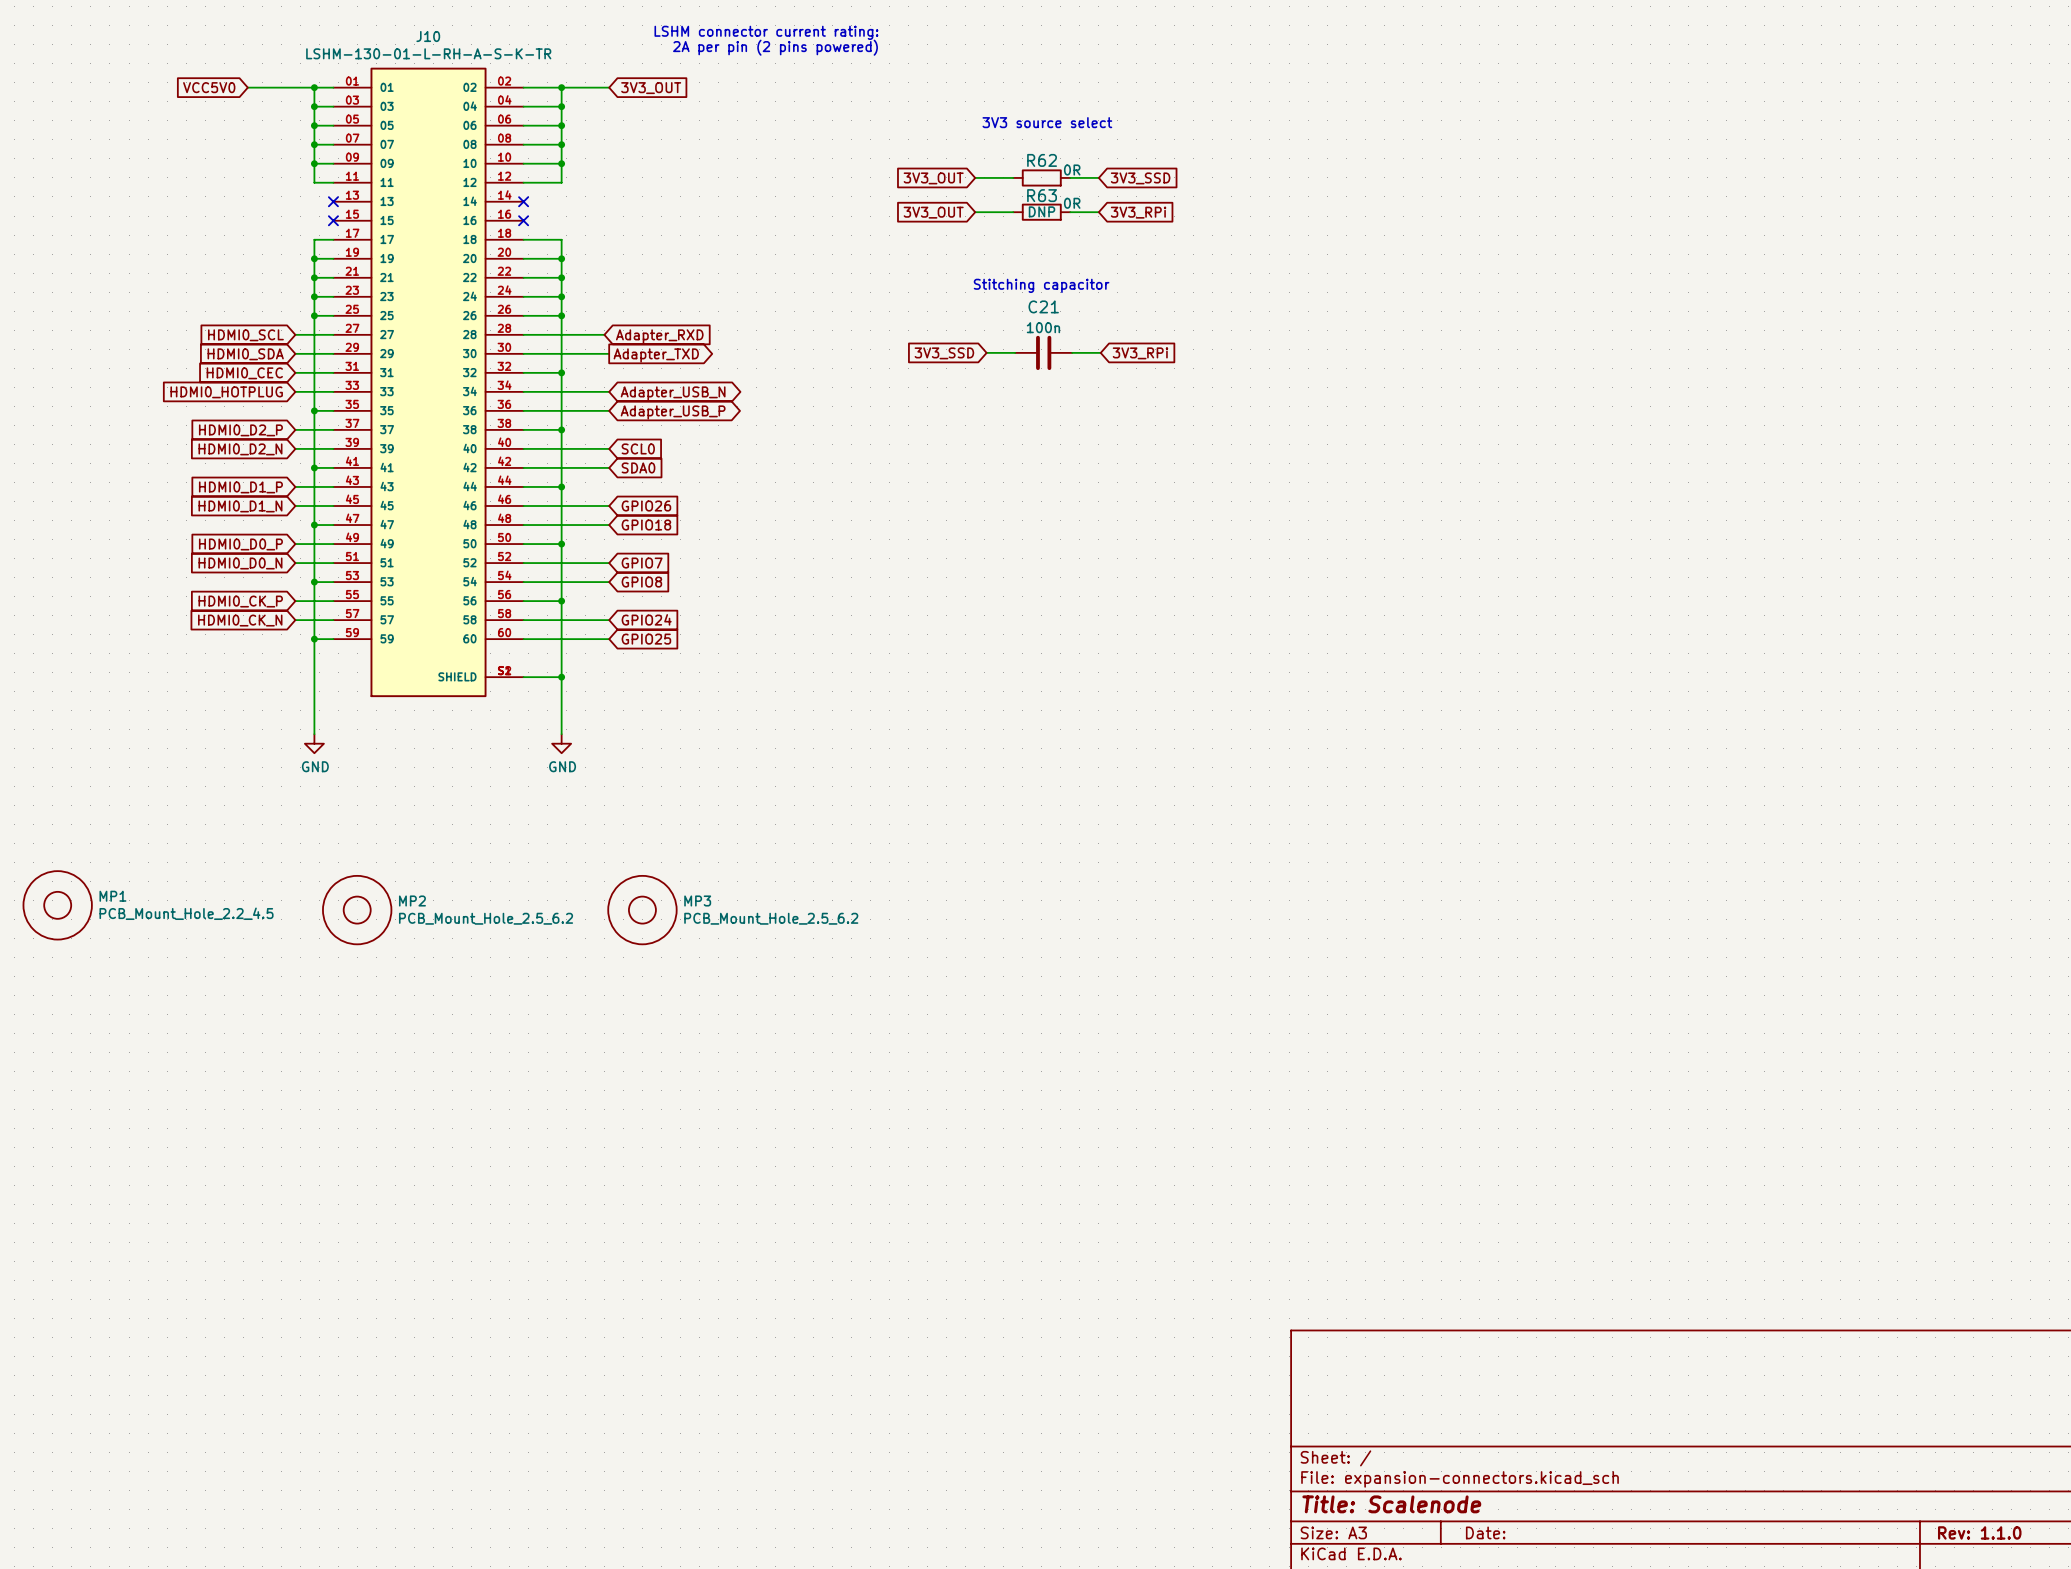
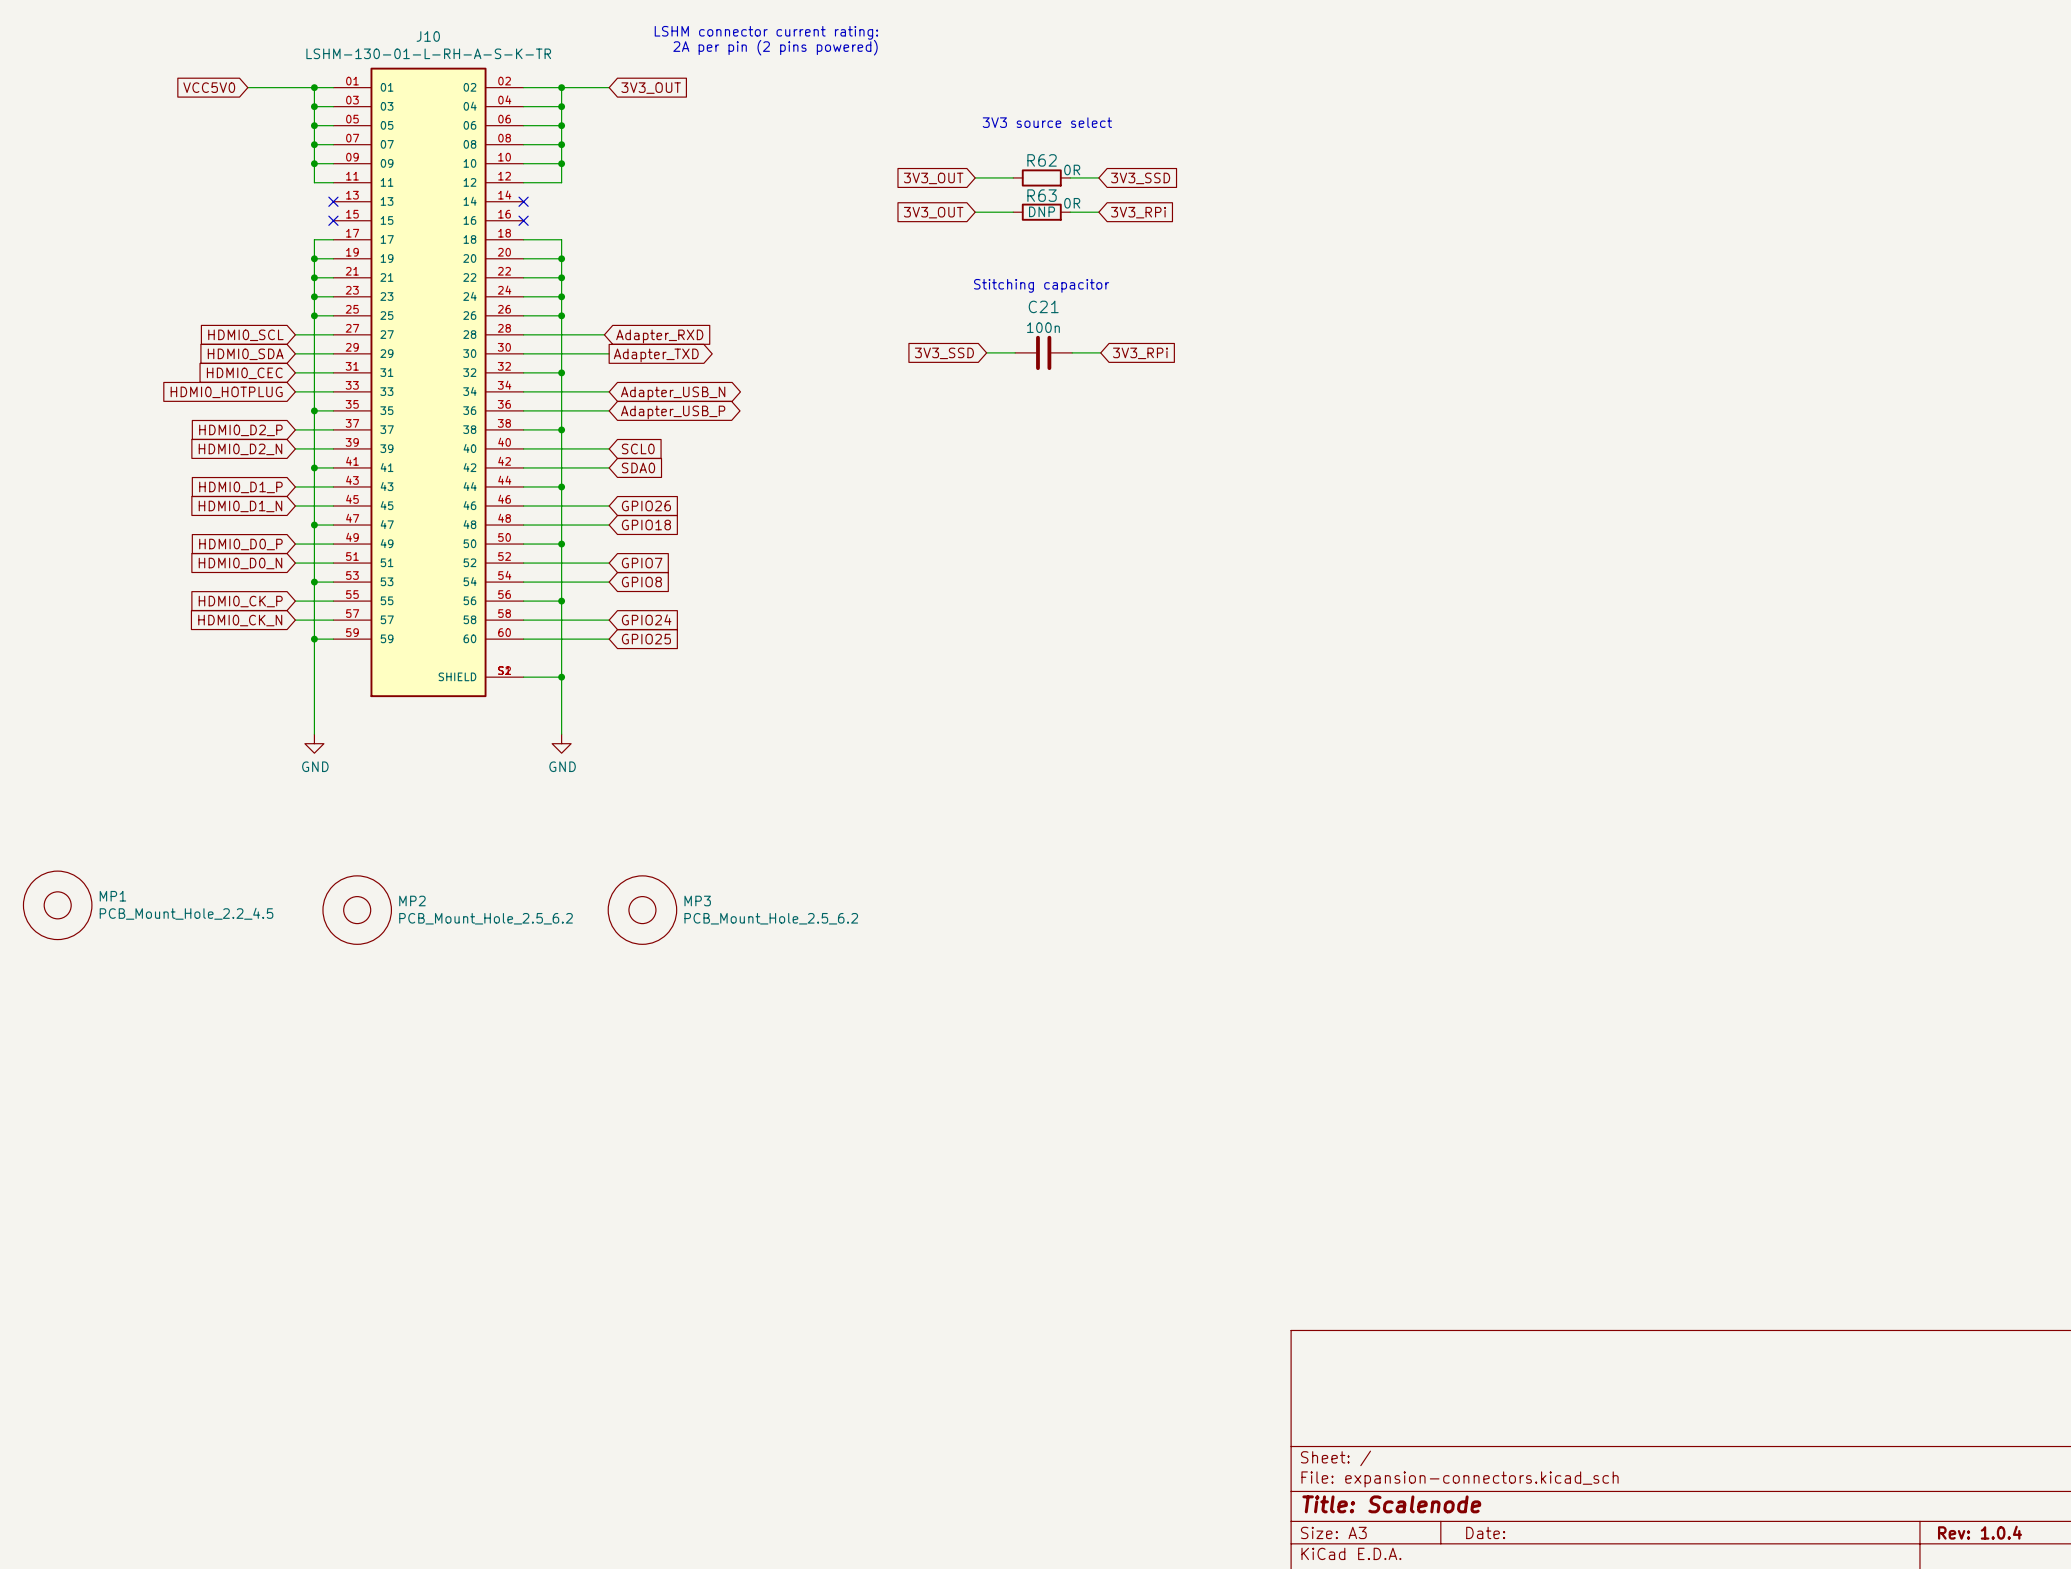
title block: Rev: 1.1.0 (1979, 1532) -> Rev: 1.0.4 (1980, 1532)

